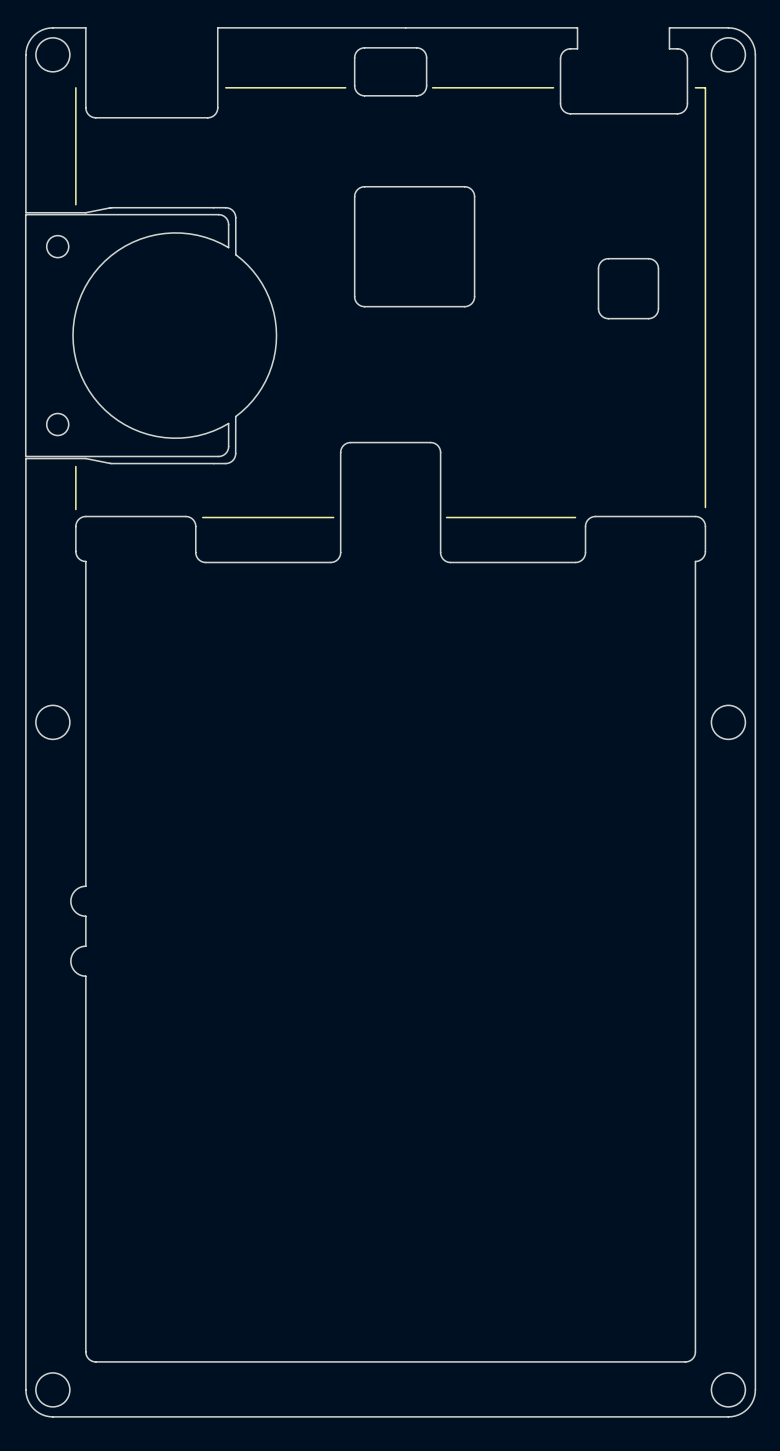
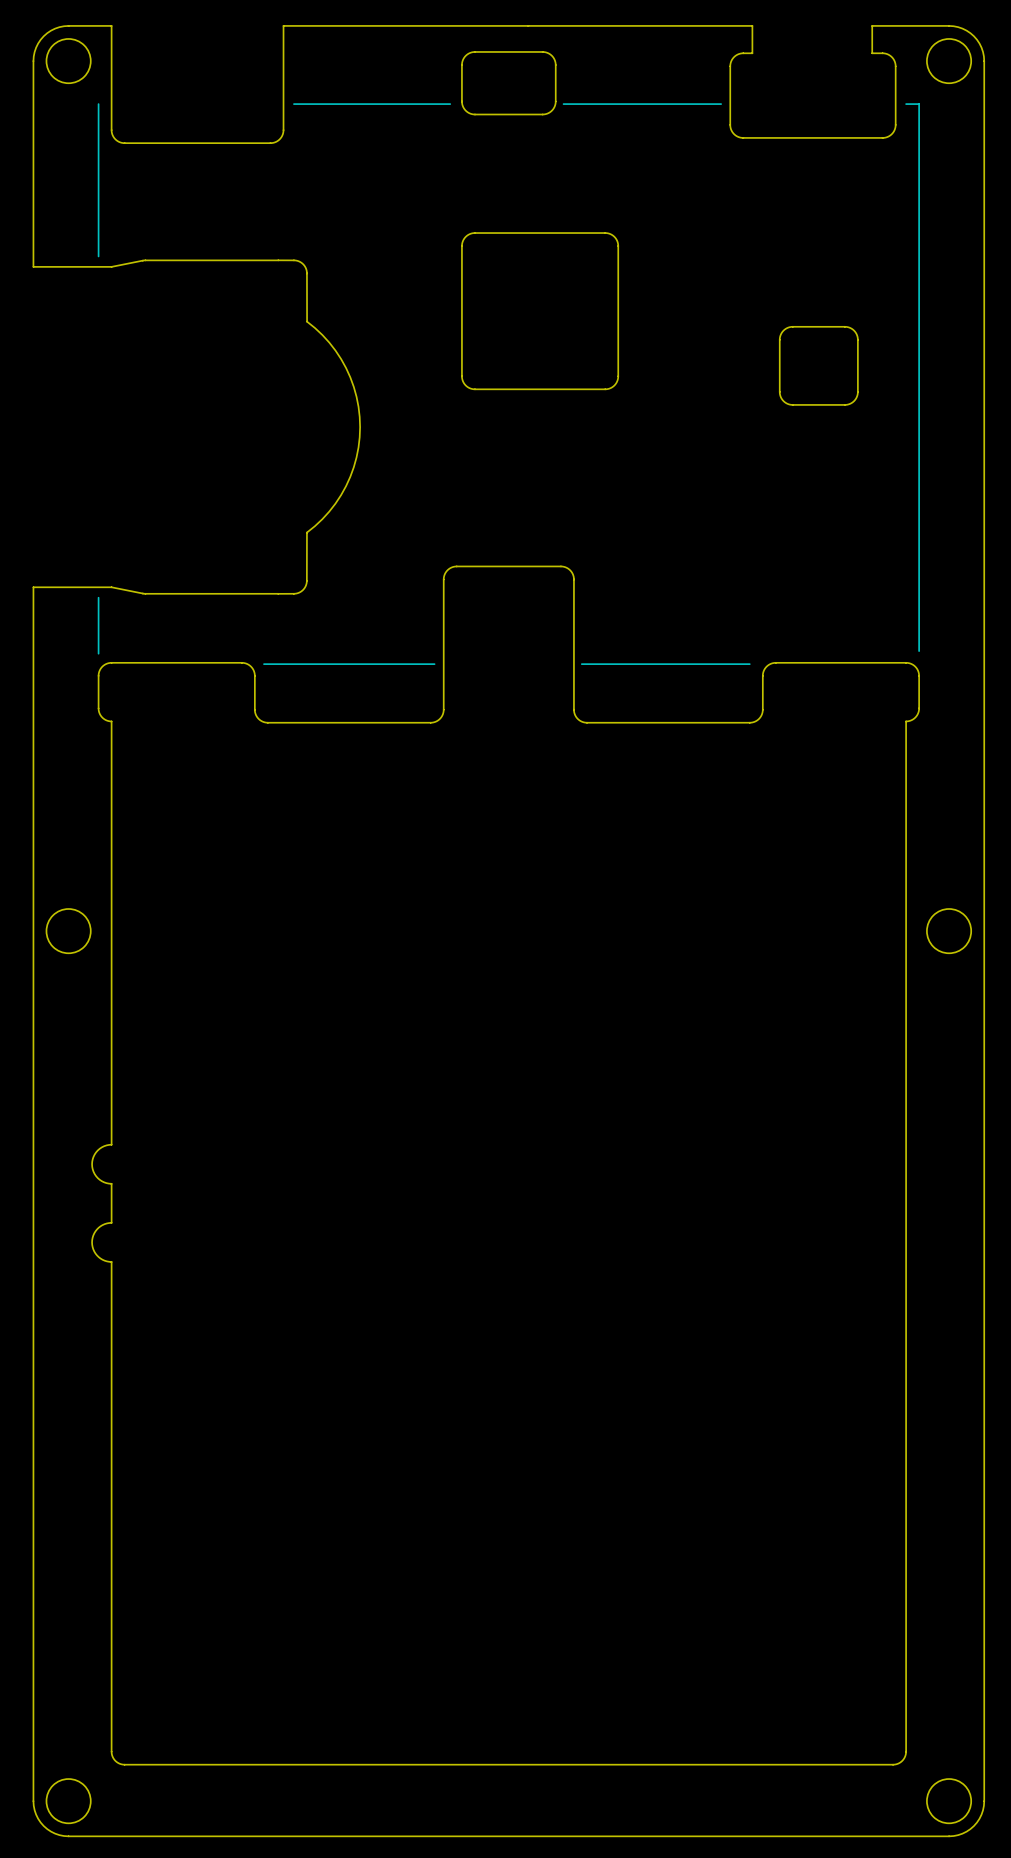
board edge: (25, 214) (218, 214) (226, 218) (228, 223) (228, 247) (205, 237) (172, 232) (140, 239) (111, 255) (93, 273) (84, 287) (76, 310) (72, 335) (74, 352) (81, 376) (93, 397) (111, 415) (140, 431) (172, 438) (205, 433) (228, 423) (228, 447) (224, 454) (218, 456) (25, 456) (25, 214) -> none
round board edge: [46, 235, 69, 258] -> none
round board edge: [46, 413, 69, 436] -> none

